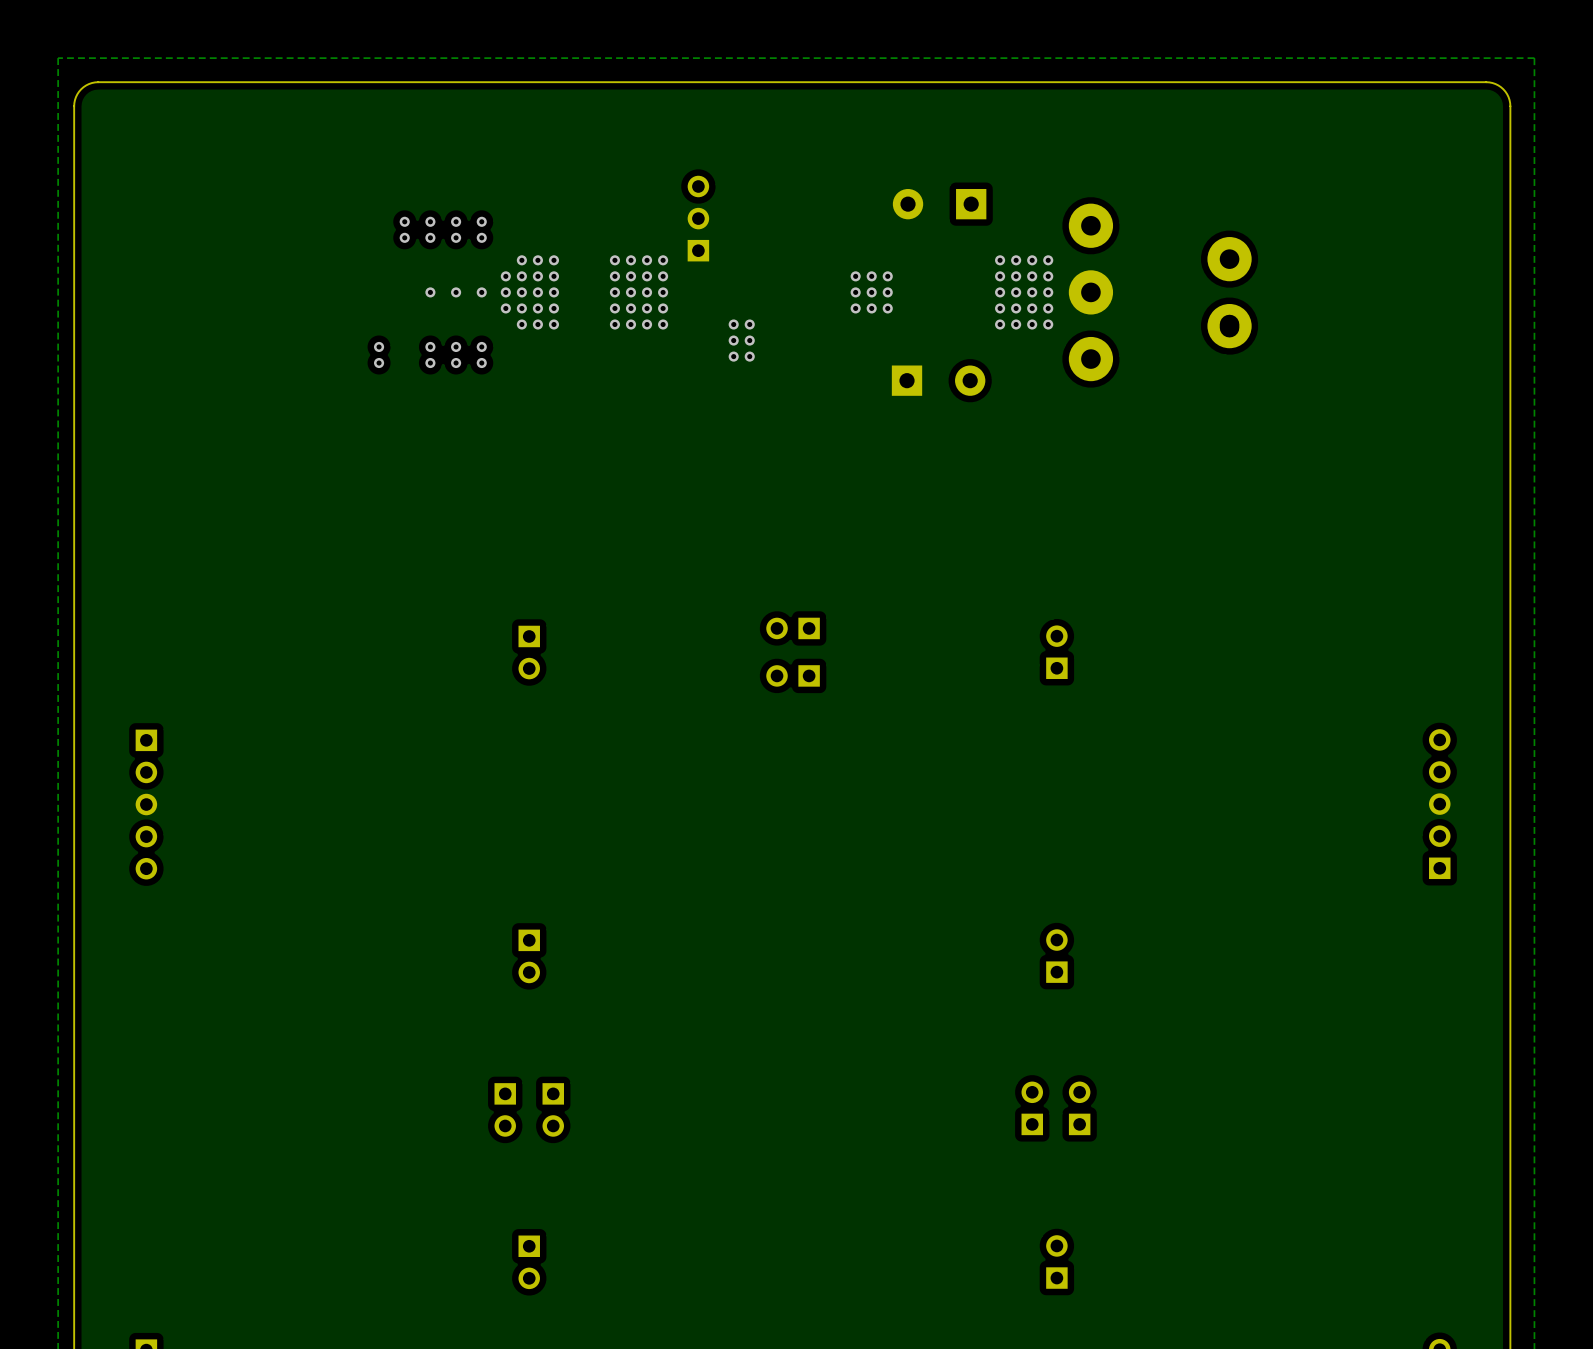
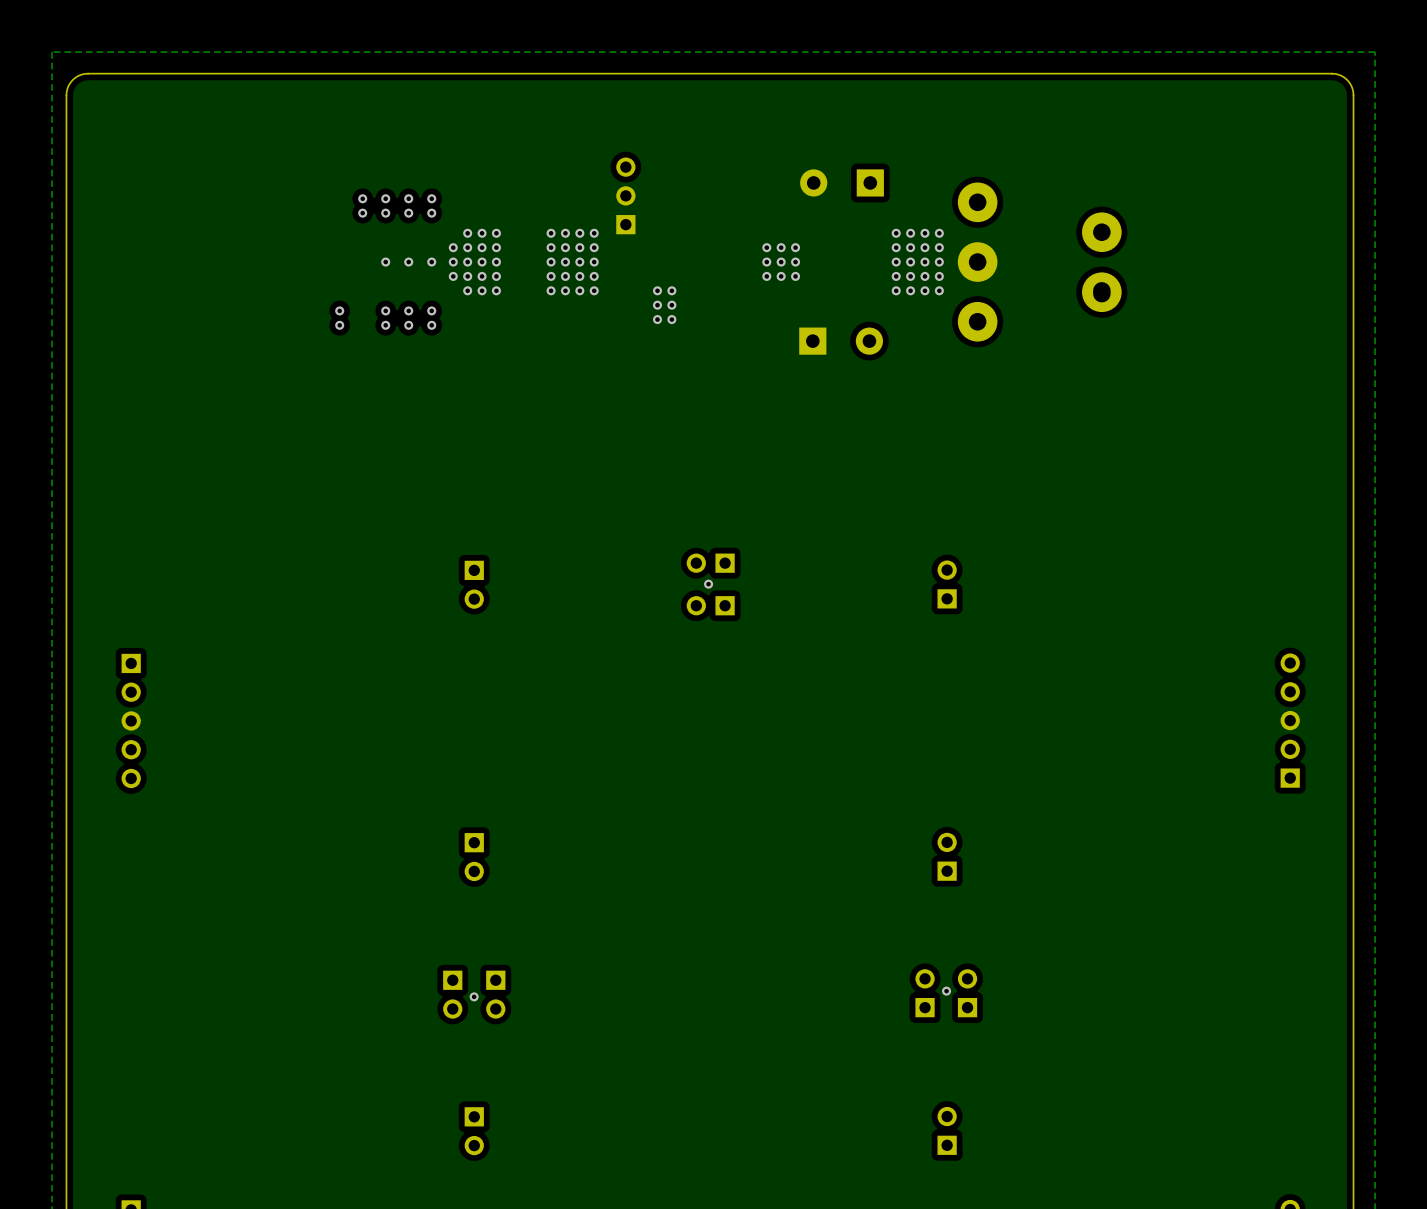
via: none -> (708, 584)
via: none -> (946, 991)
via: none -> (474, 996)

